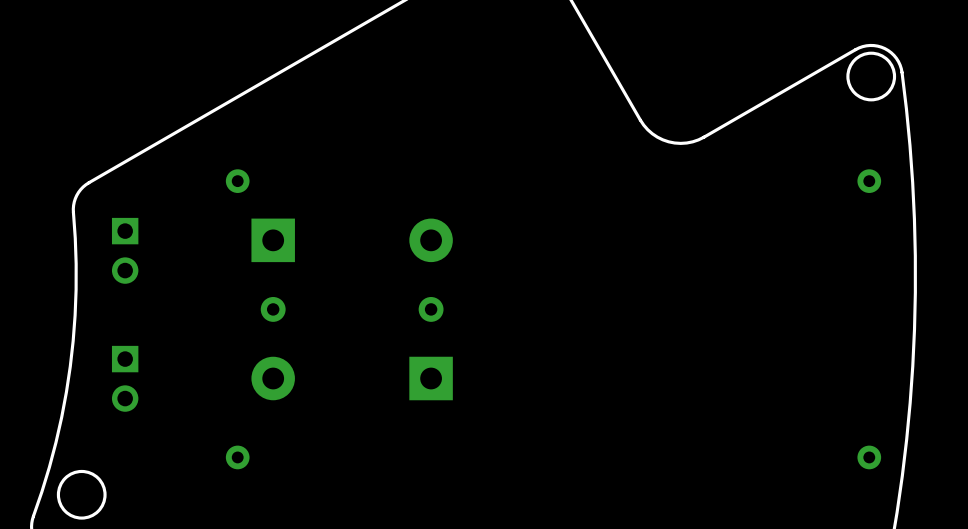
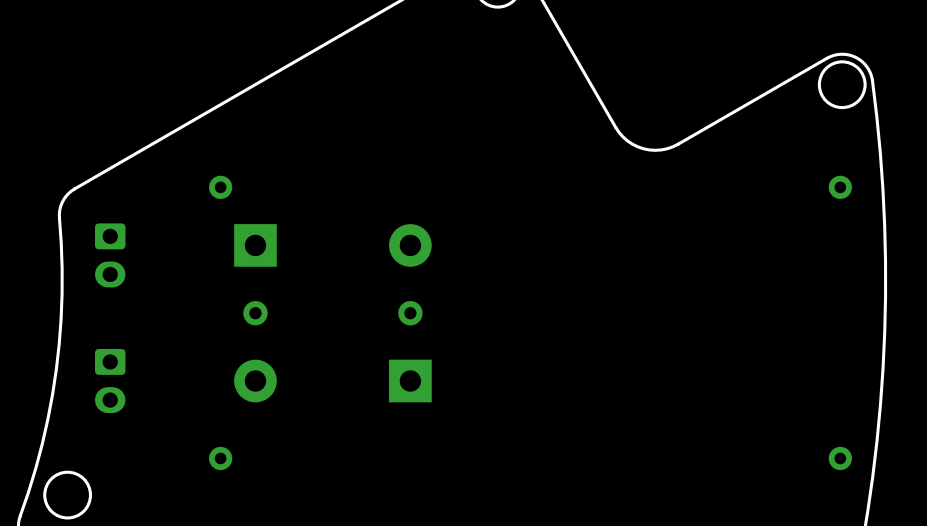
part footprint: [111, 217, 139, 284] -> [94, 223, 126, 288]
part footprint: [111, 345, 139, 412] -> [94, 348, 126, 414]

